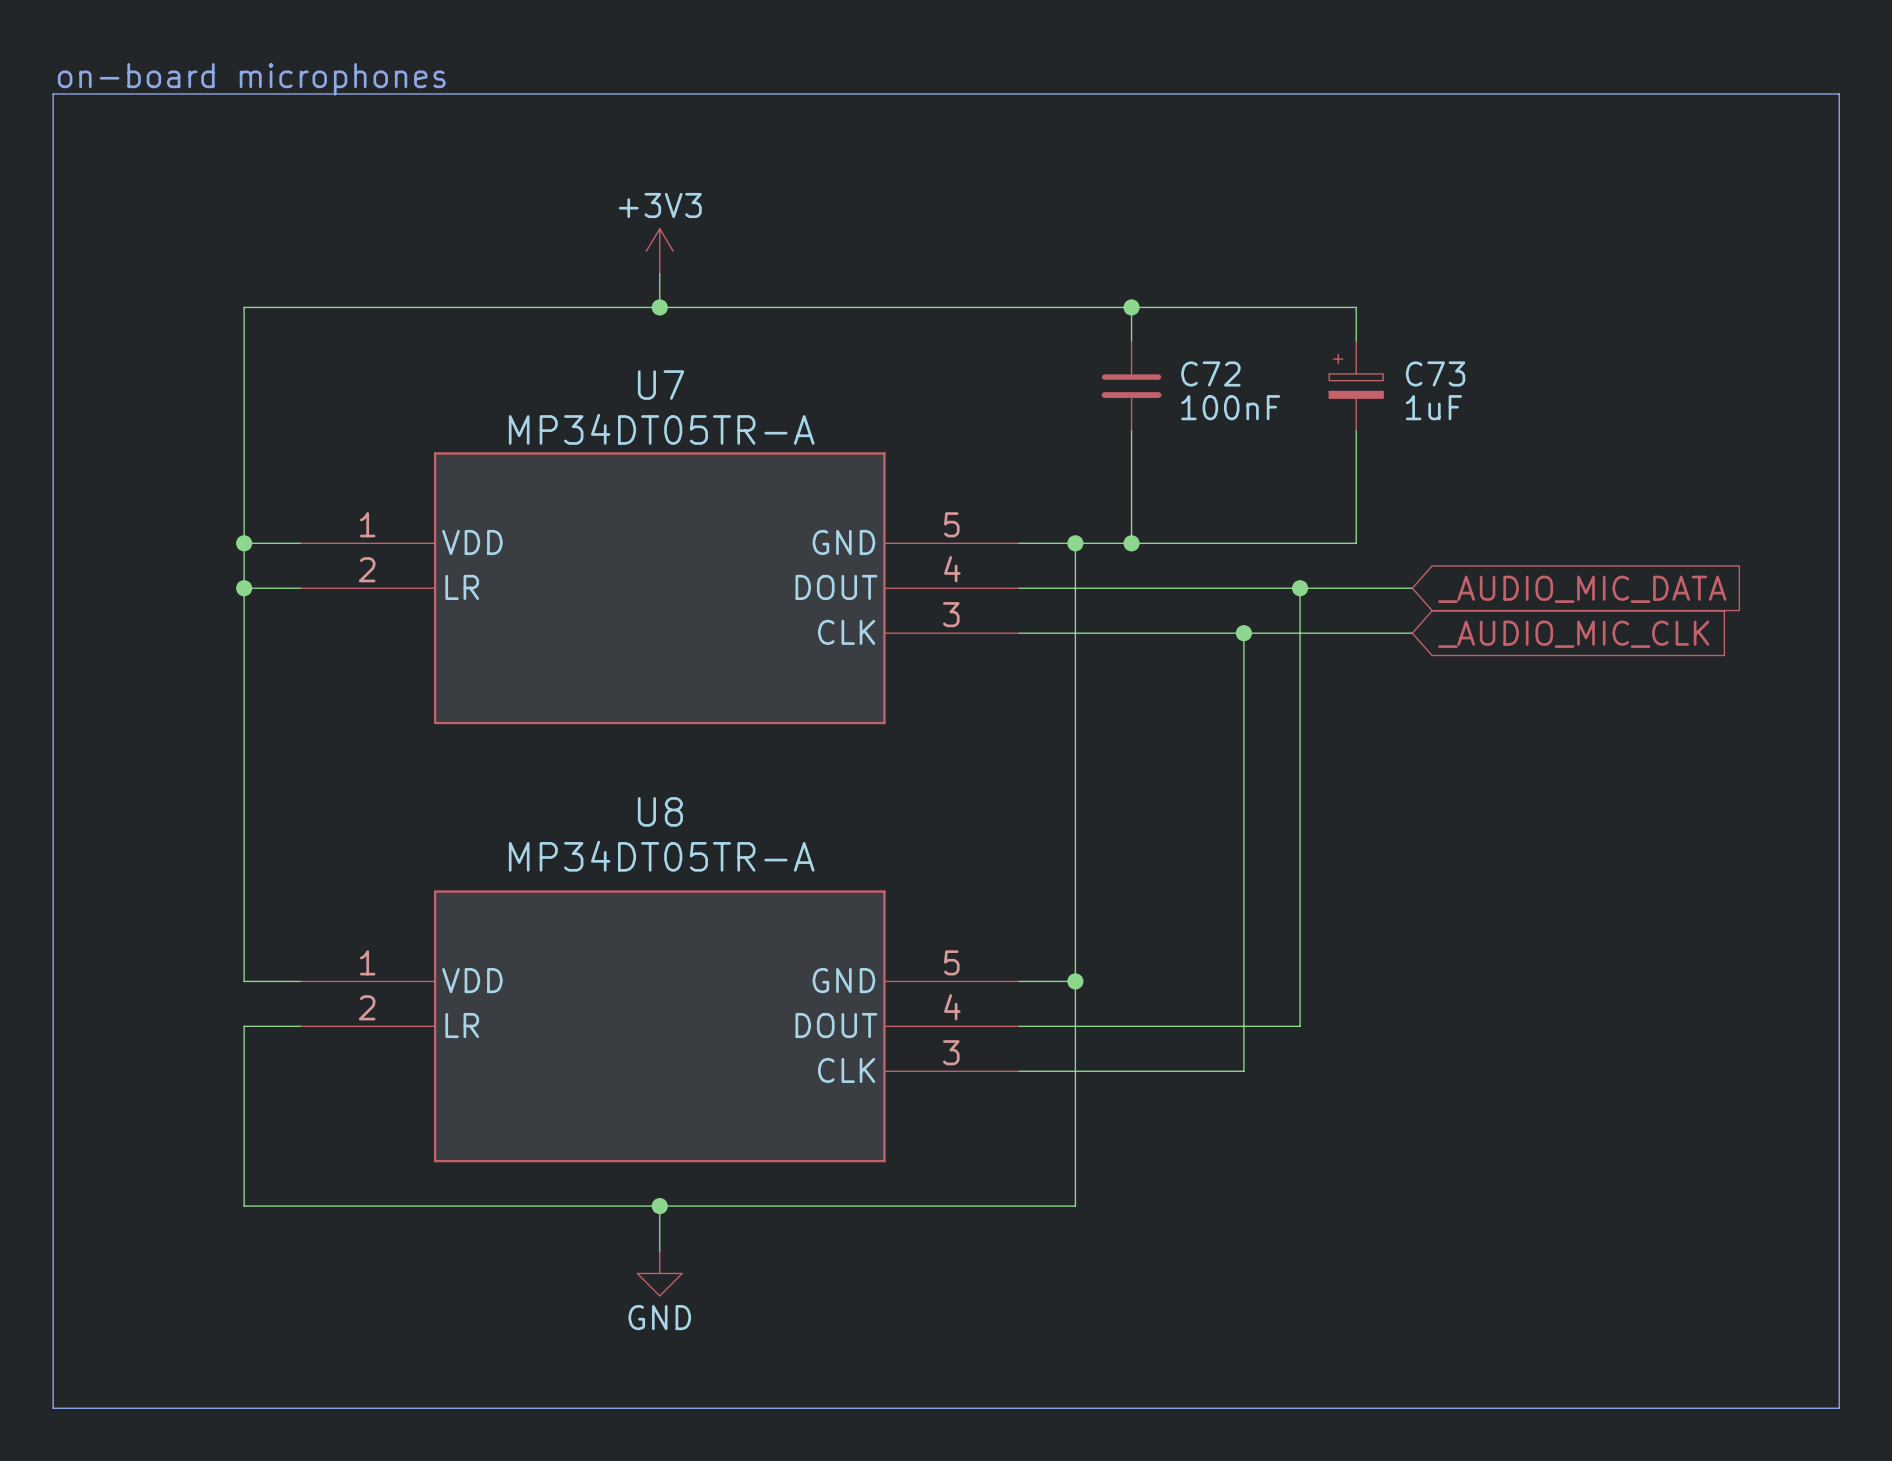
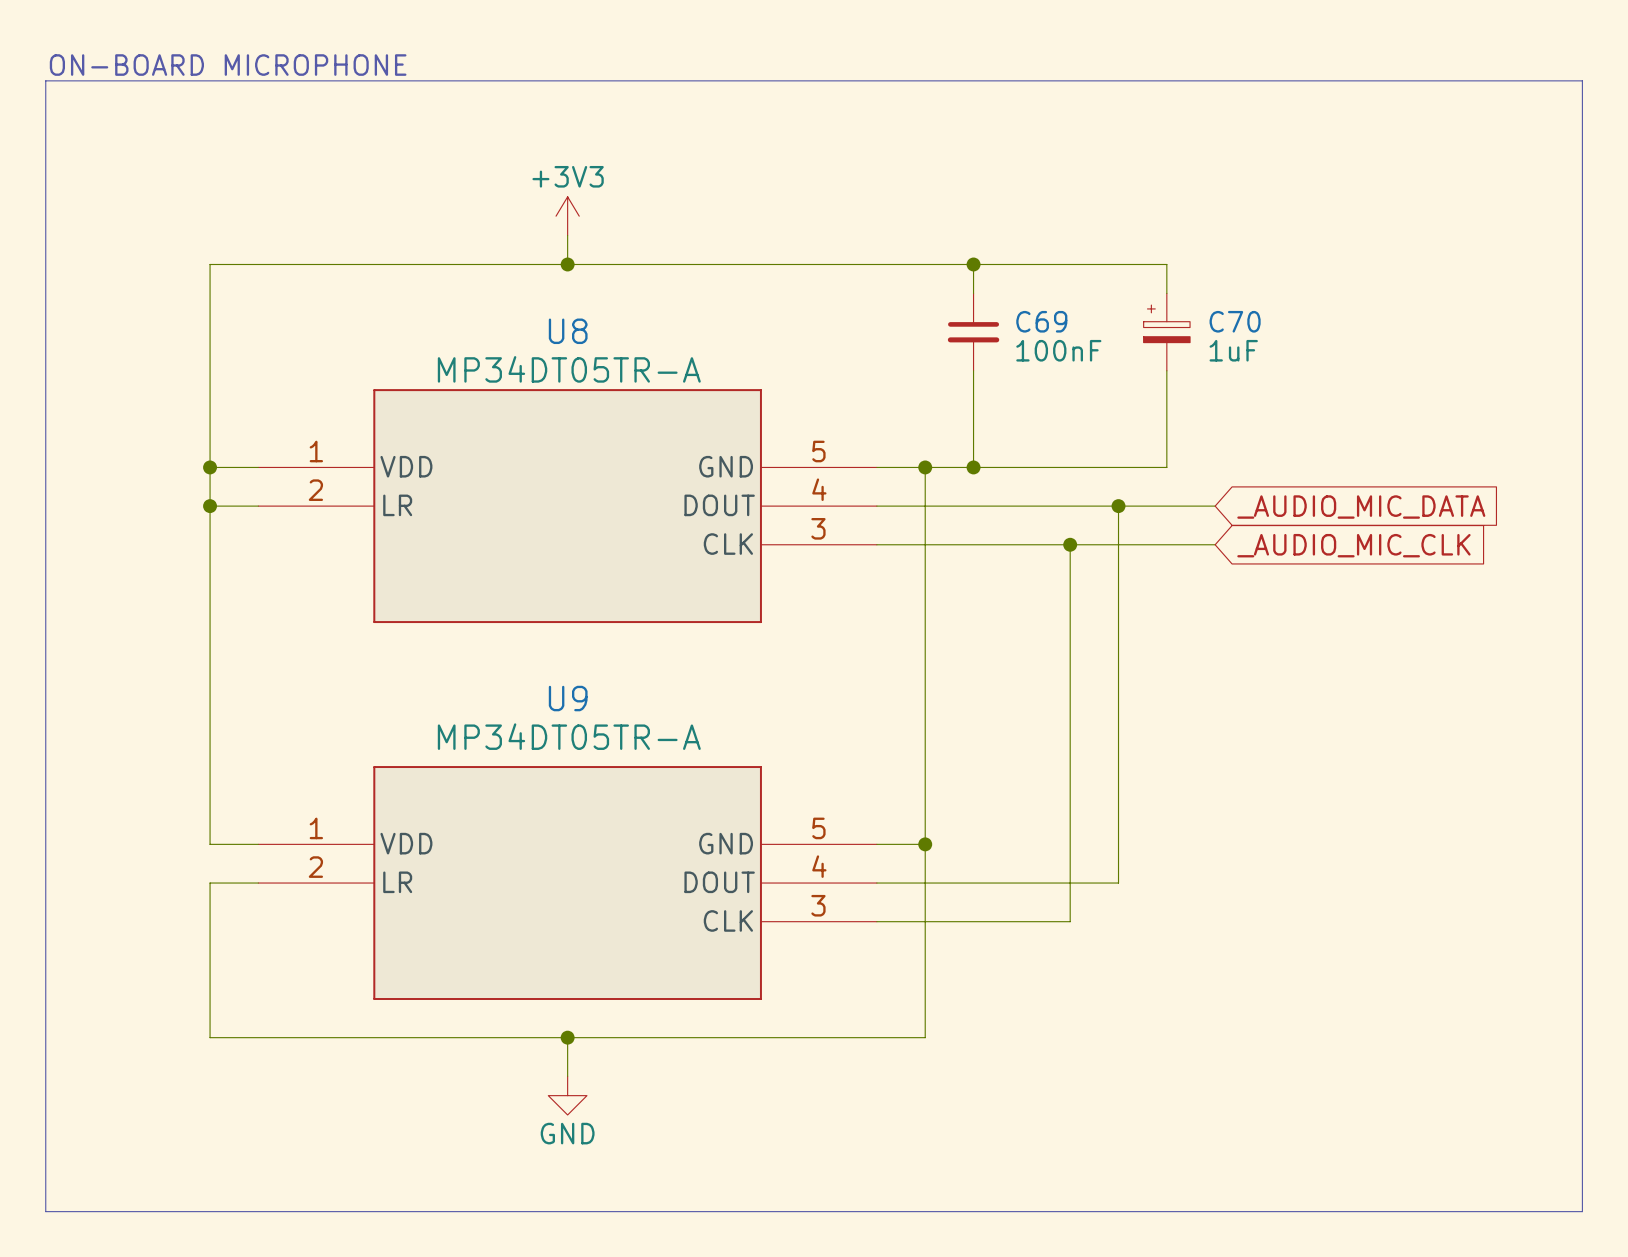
text: on-board microphones (251, 79) -> ON-BOARD MICROPHONE (228, 65)
C72 name: C72 (1210, 373) -> C69 (1041, 321)
C73 name: C73 (1435, 373) -> C70 (1235, 321)
U7 name: U7 (661, 385) -> U8 (568, 331)
U8 name: U8 (660, 811) -> U9 (568, 698)

